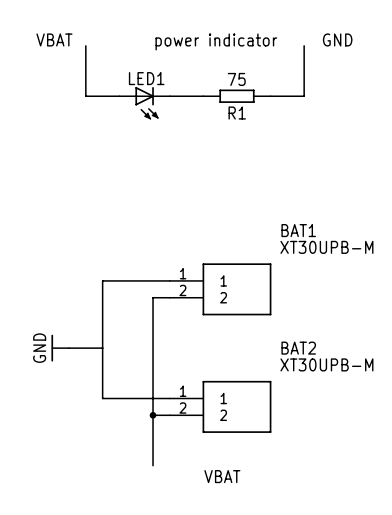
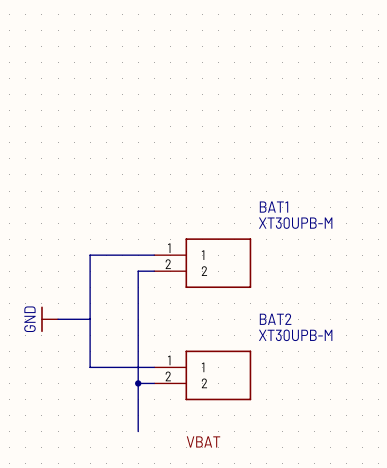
label: VBAT (54, 39) -> none
label: GND (337, 39) -> none
text: power indicator (216, 41) -> none
wire: (85, 45) (85, 96) (119, 96) -> none
wire: (304, 45) (304, 96) (270, 96) -> none
wire: (169, 96) (203, 96) -> none
R1: 75 (236, 96) -> none
LED1: (144, 103) -> none

